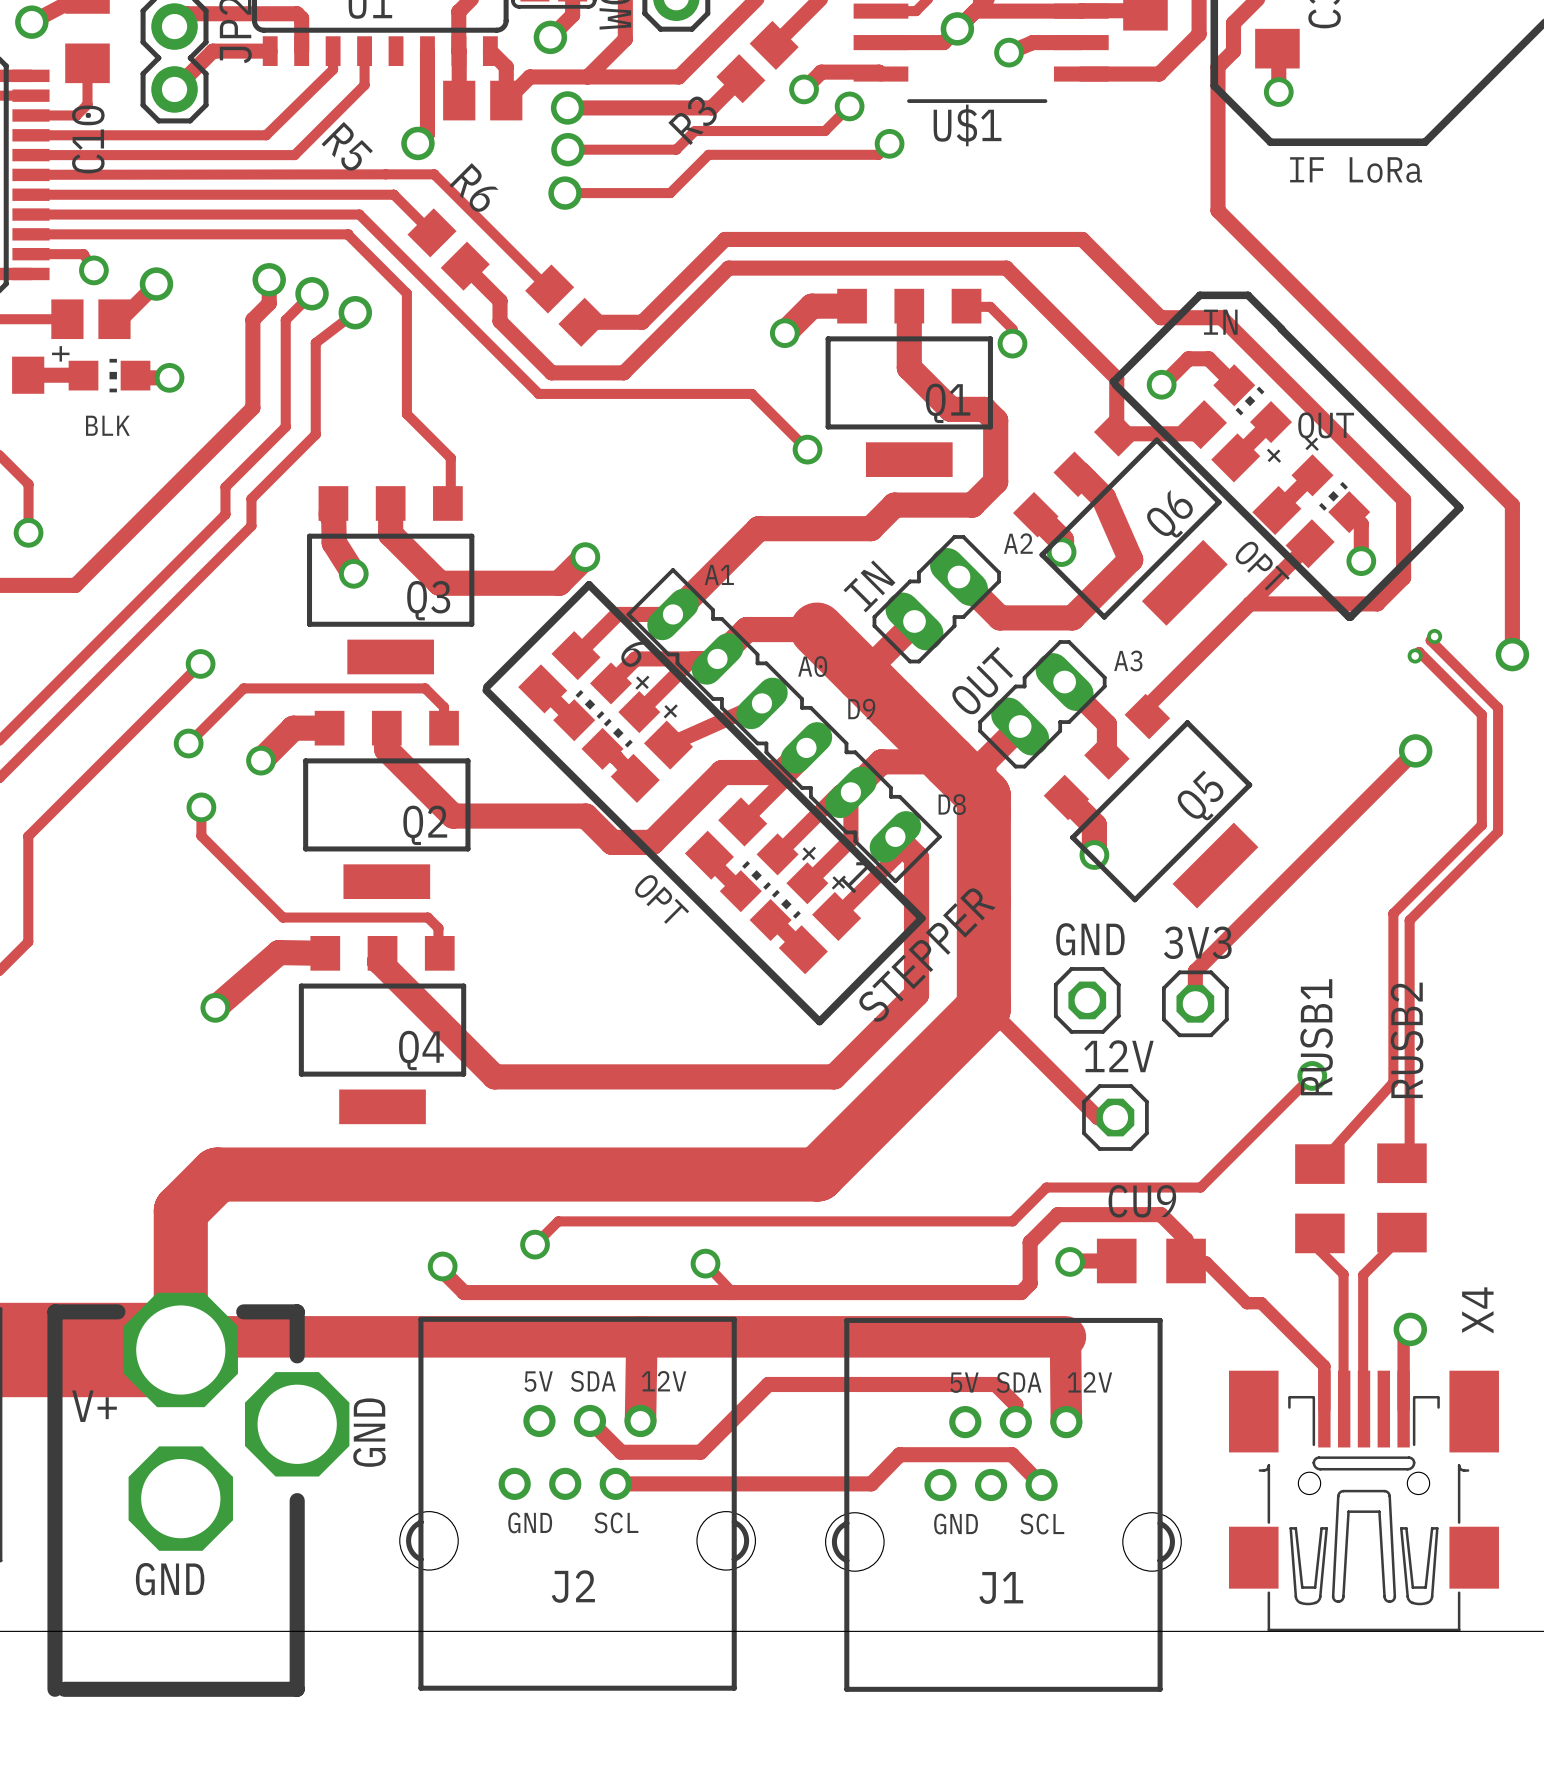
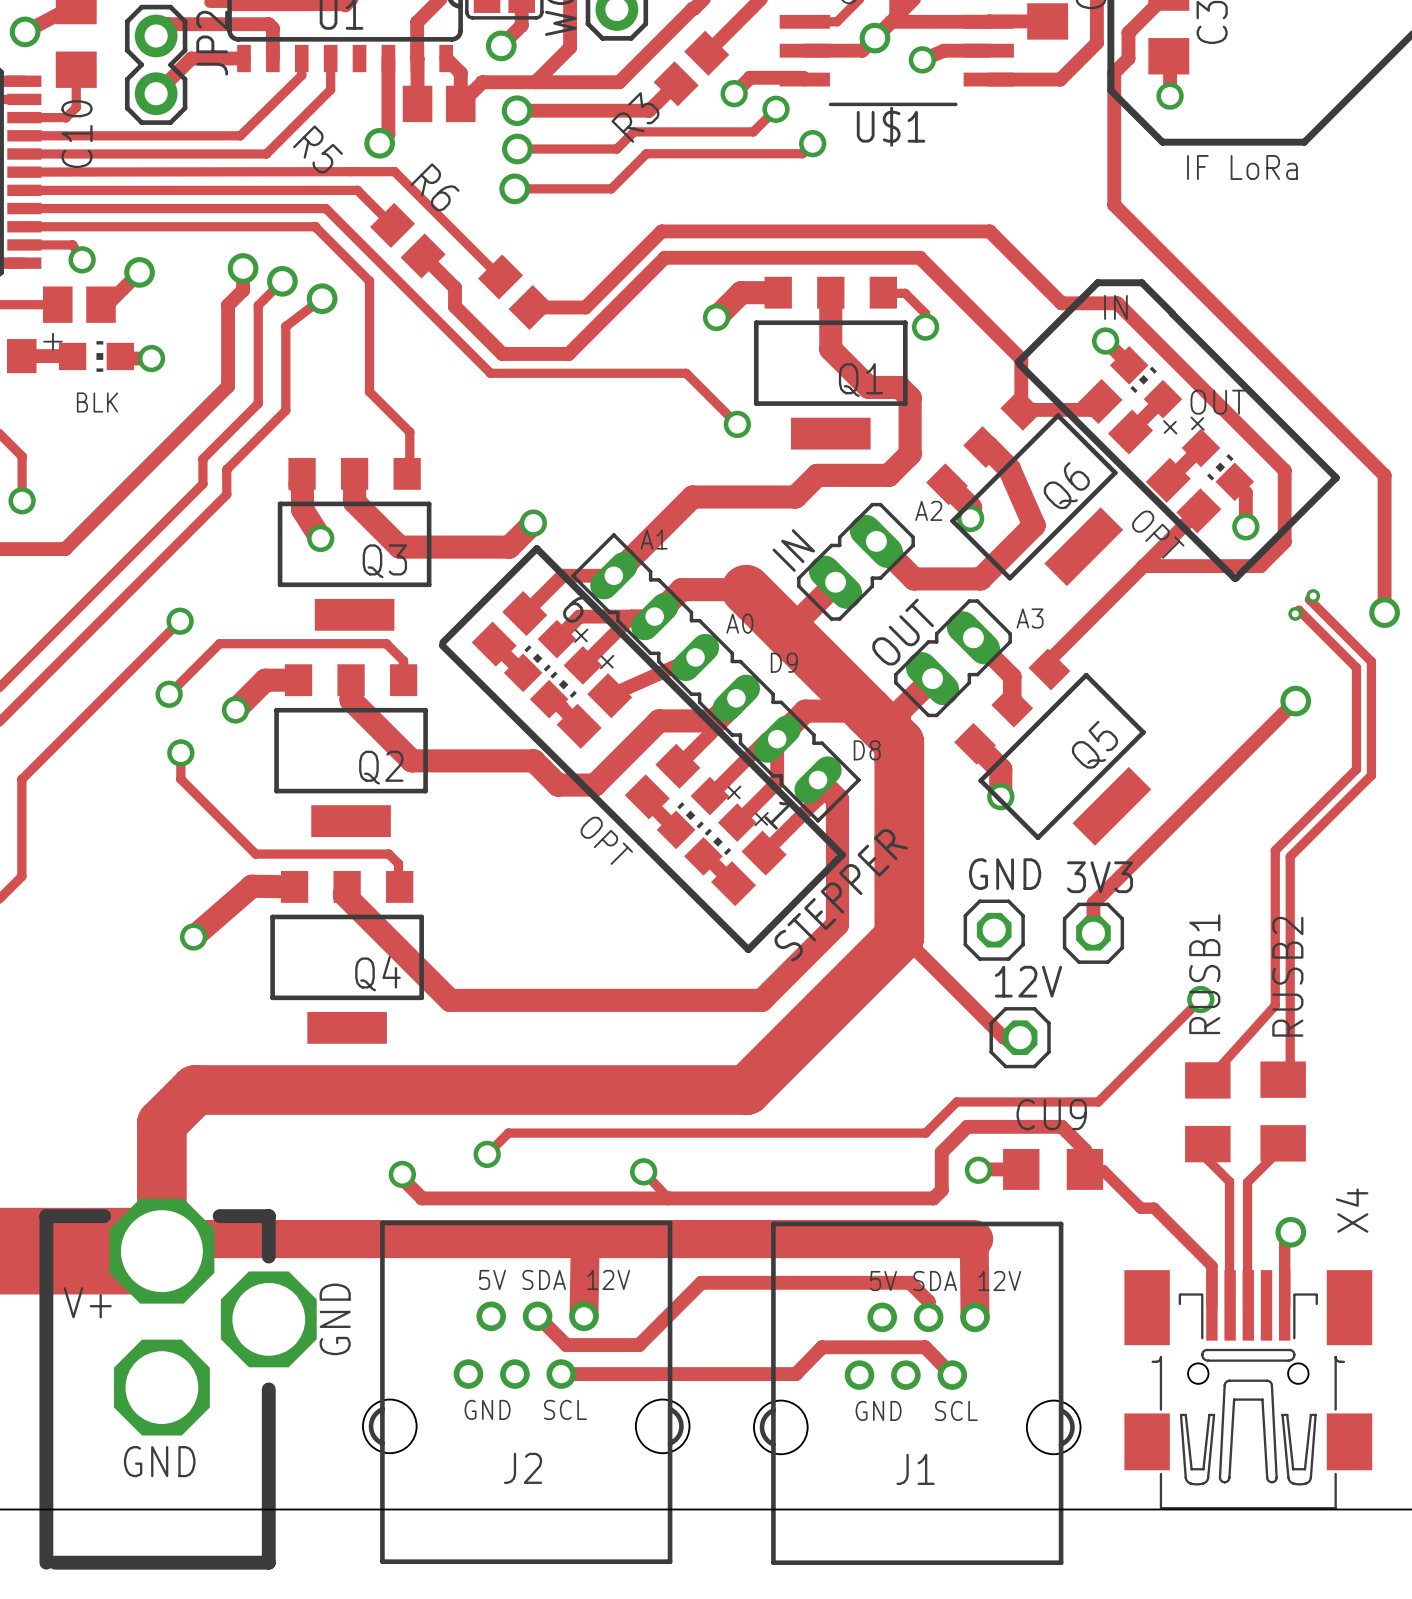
track: (1208, 358) (1188, 358) (1161, 384) -> none
via position: (1161, 384) -> (1105, 341)

